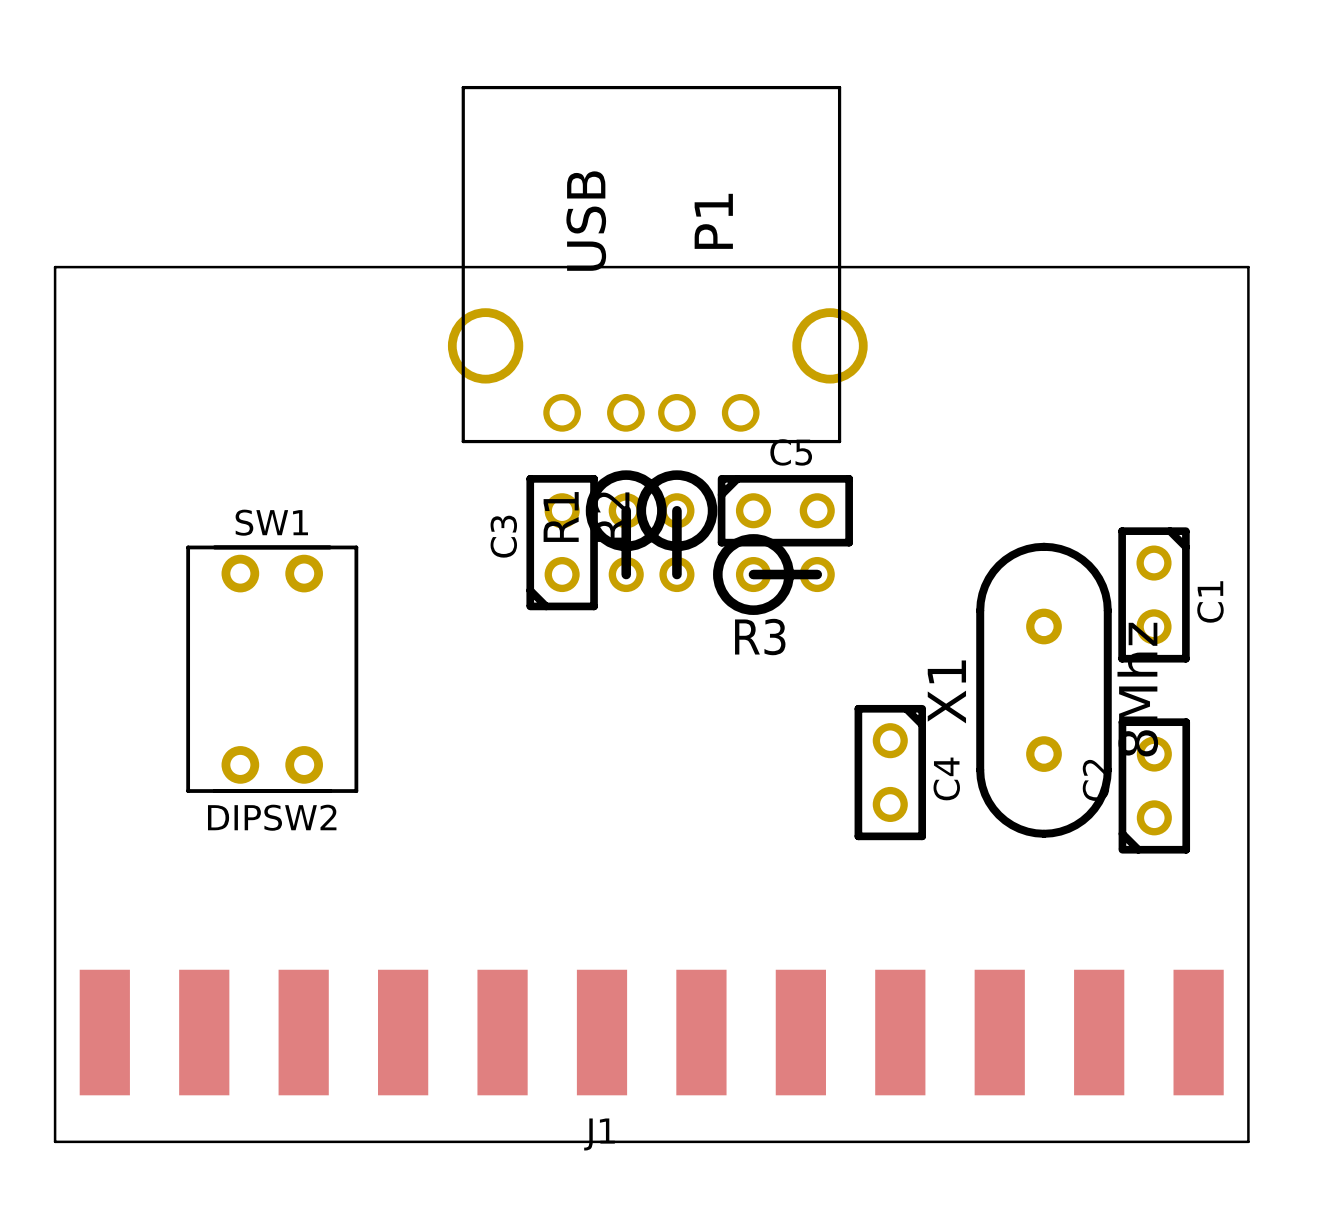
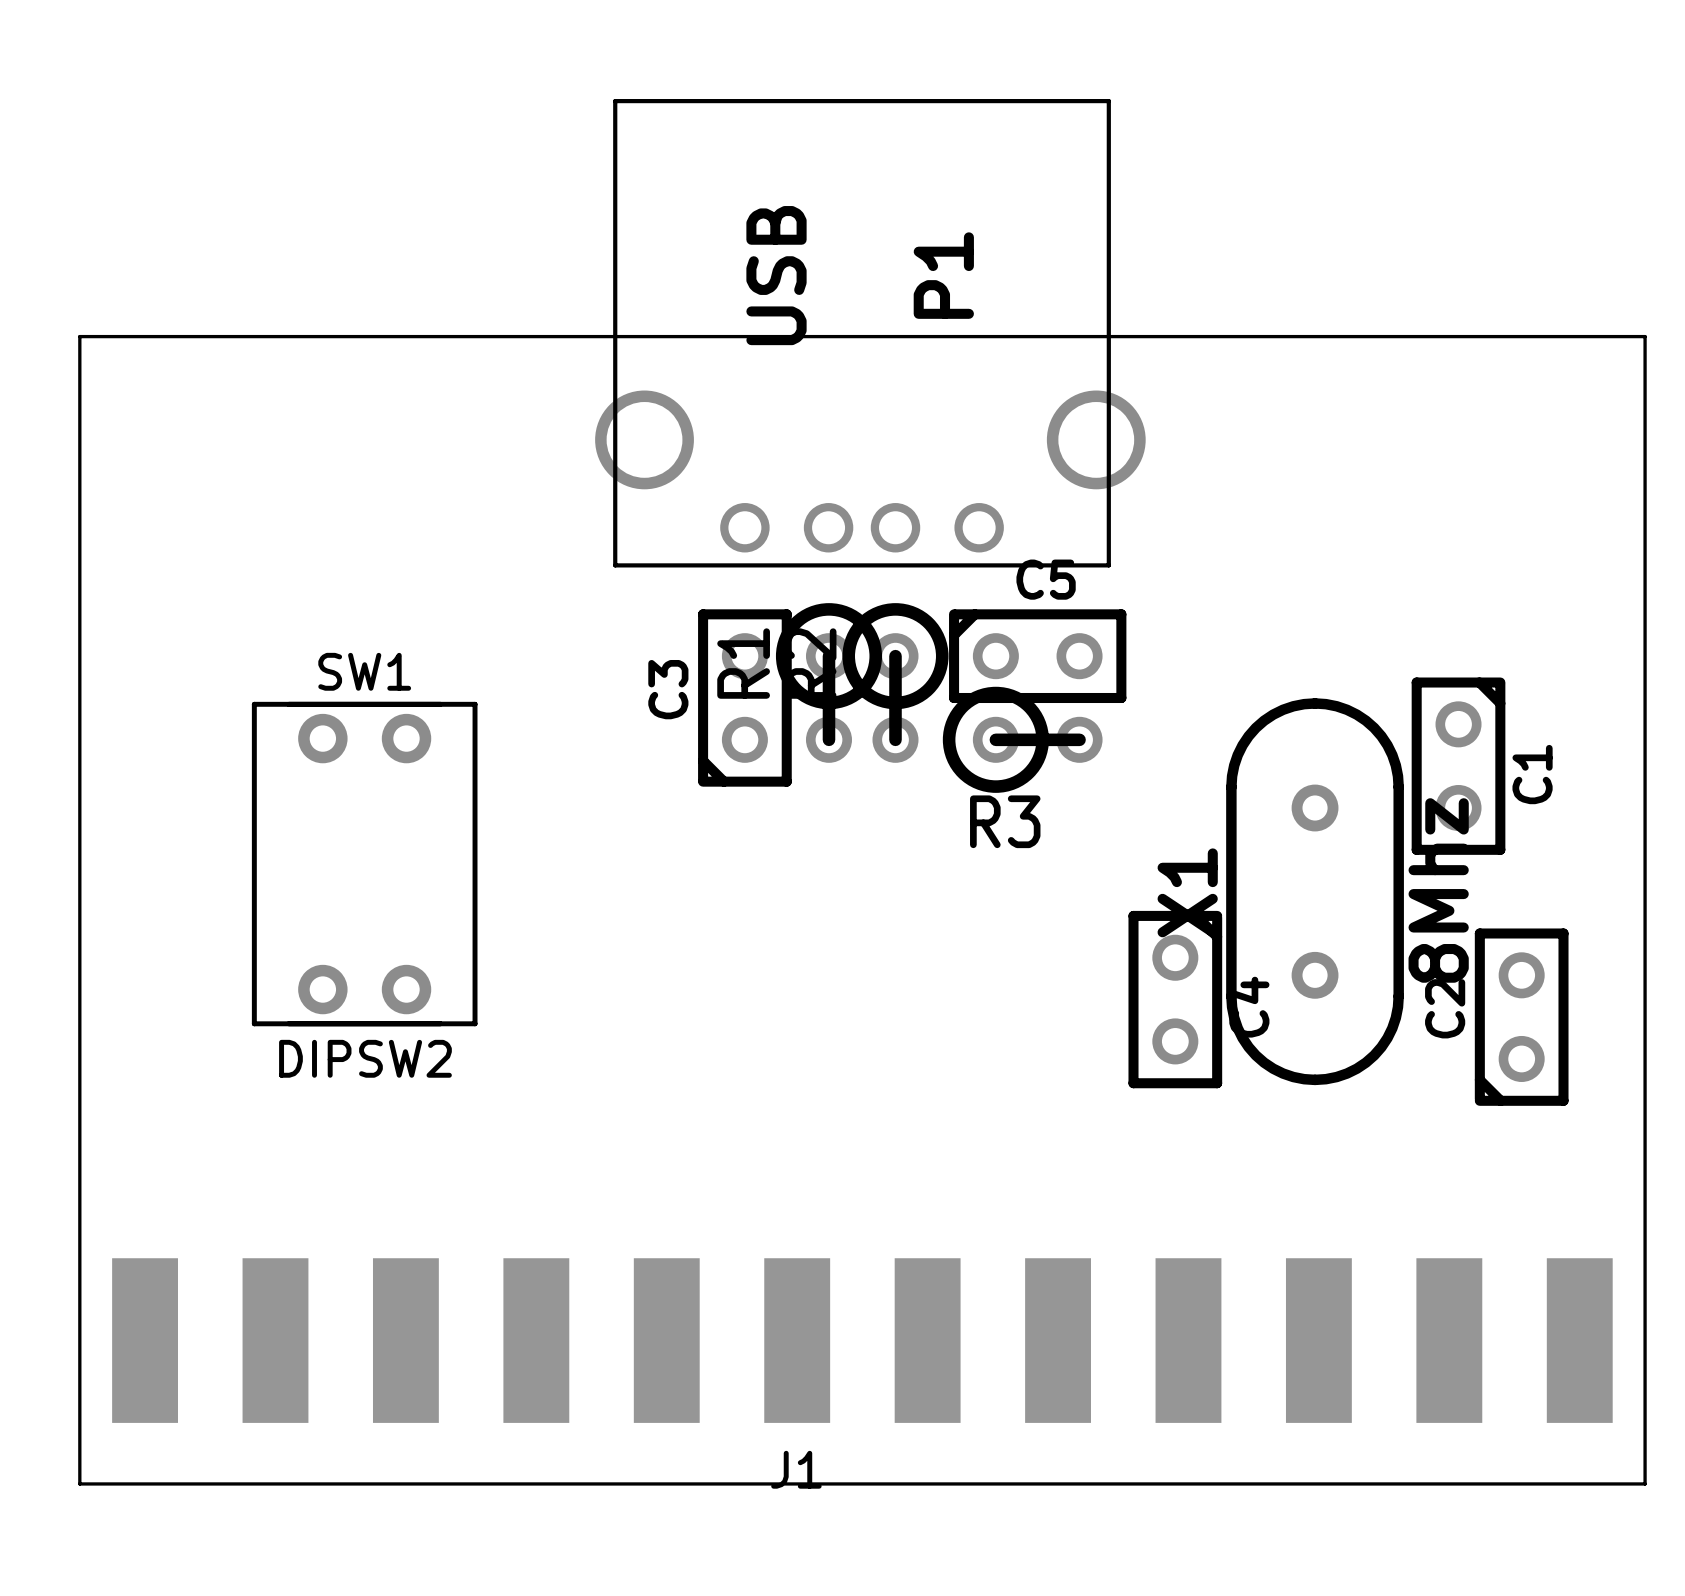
C1 position: (1154, 594) -> (1458, 766)
X1 position: (1043, 690) -> (1315, 891)

